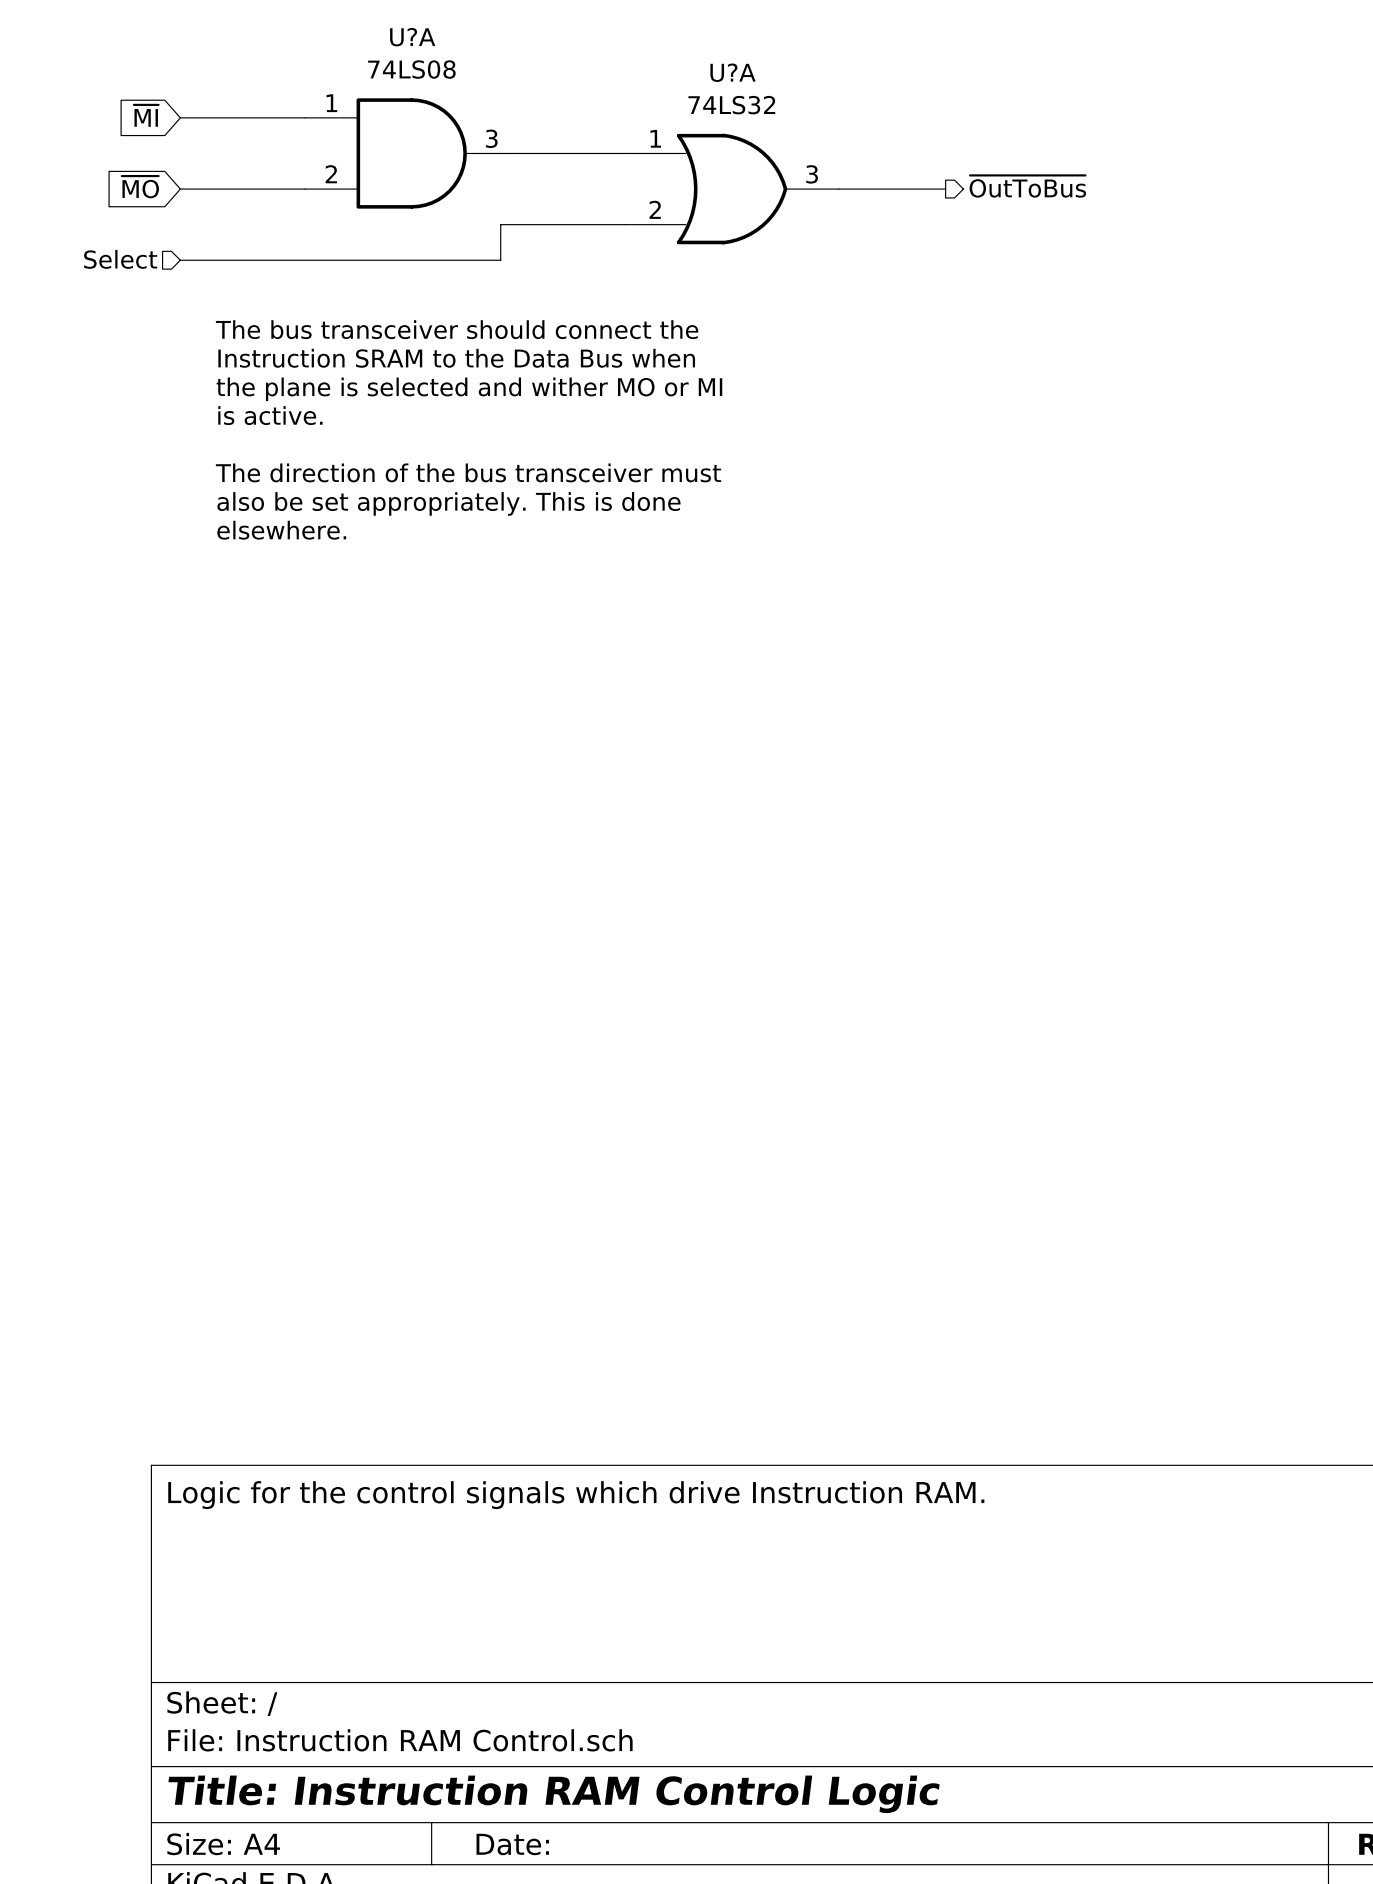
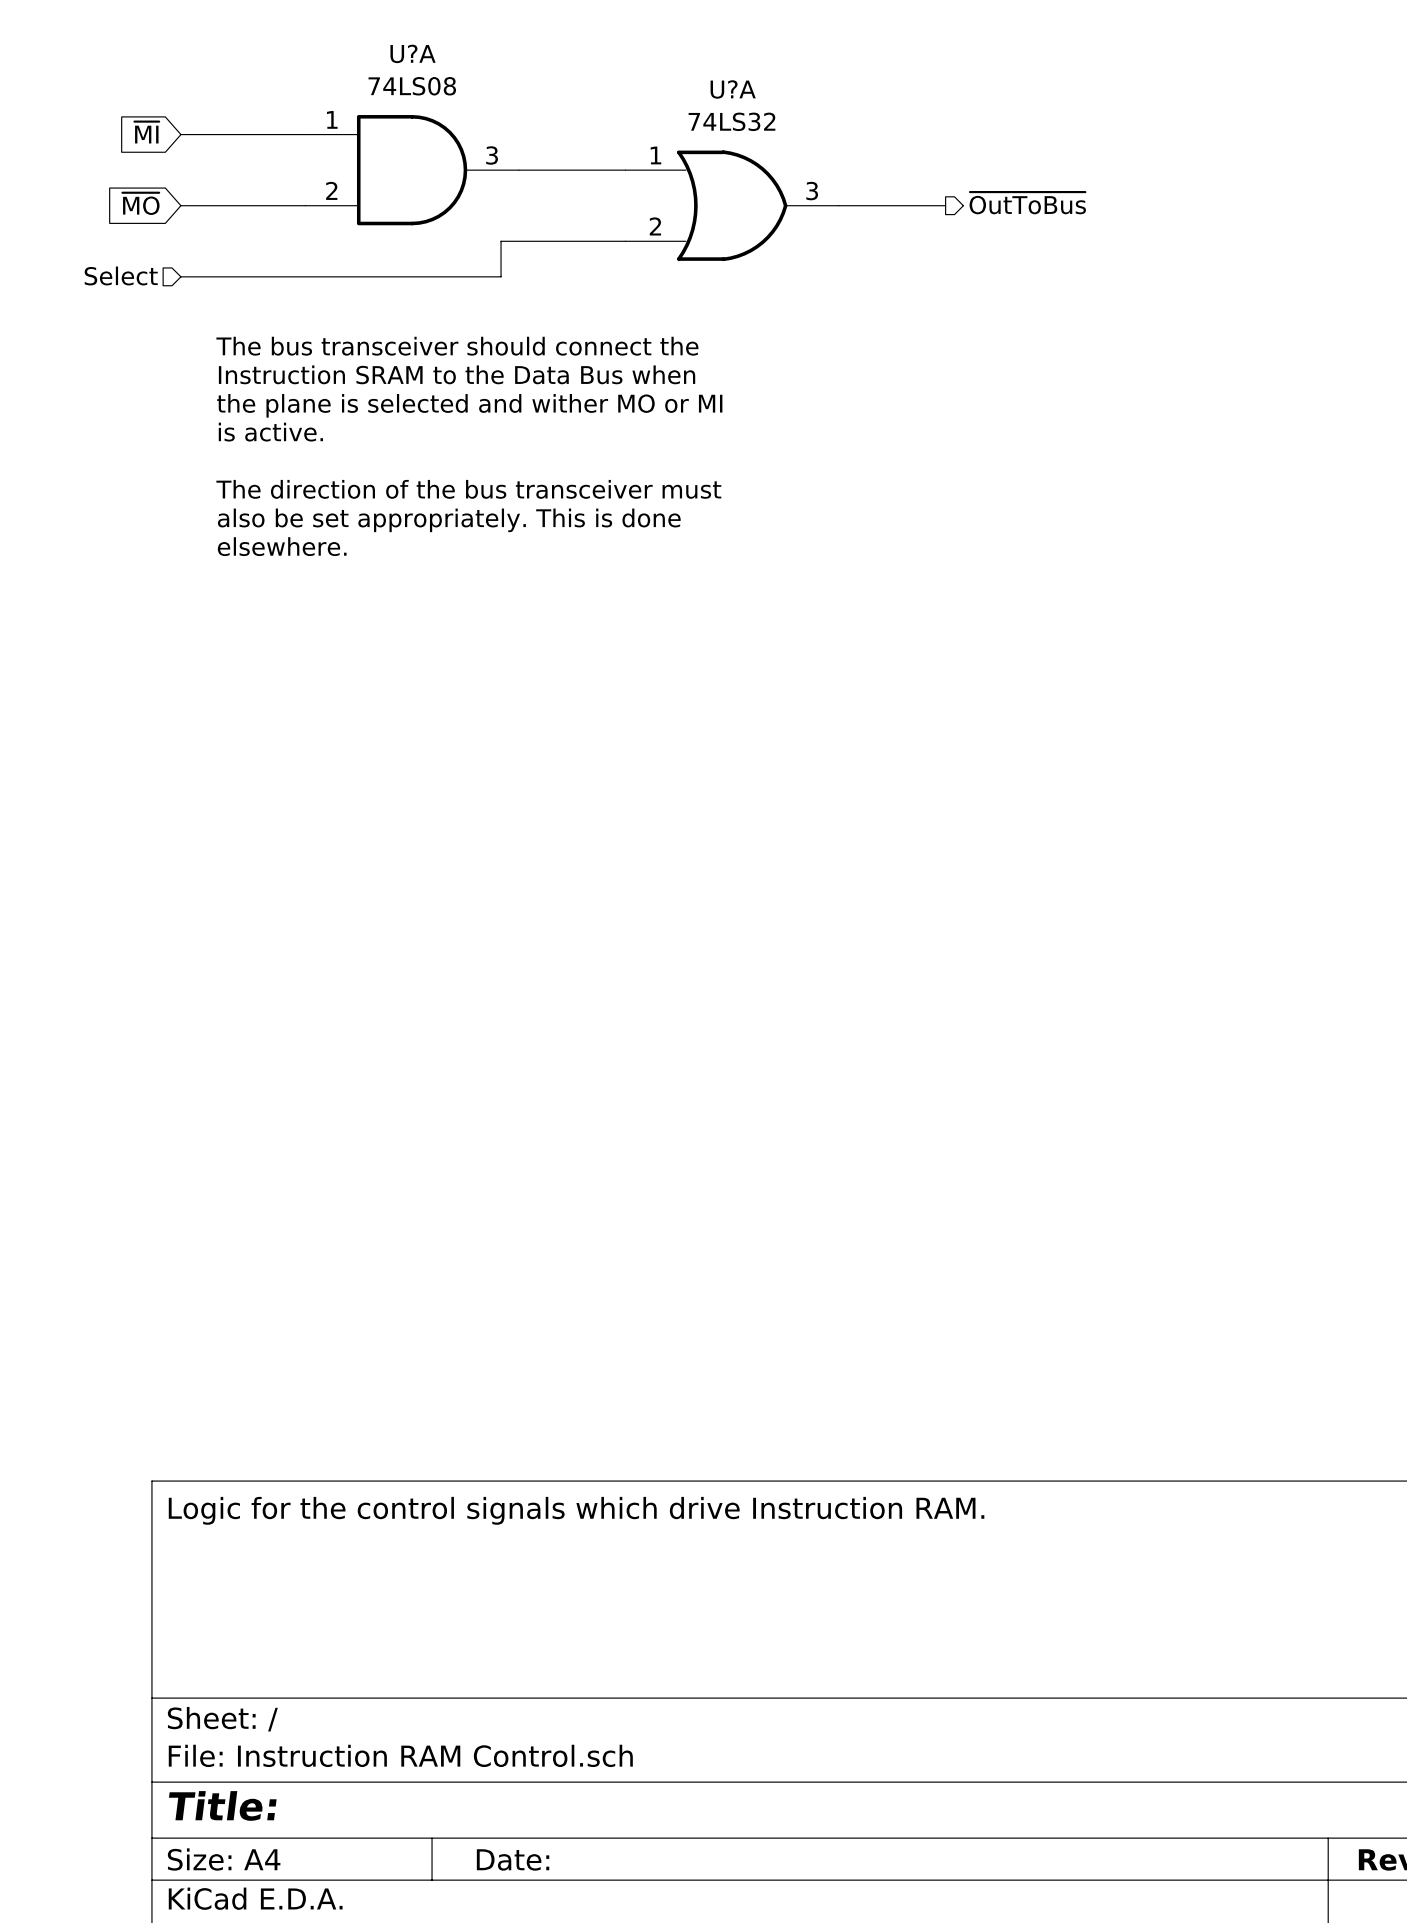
title block: Title: Instruction RAM Control Logic (553, 1794) -> Title: (222, 1805)

